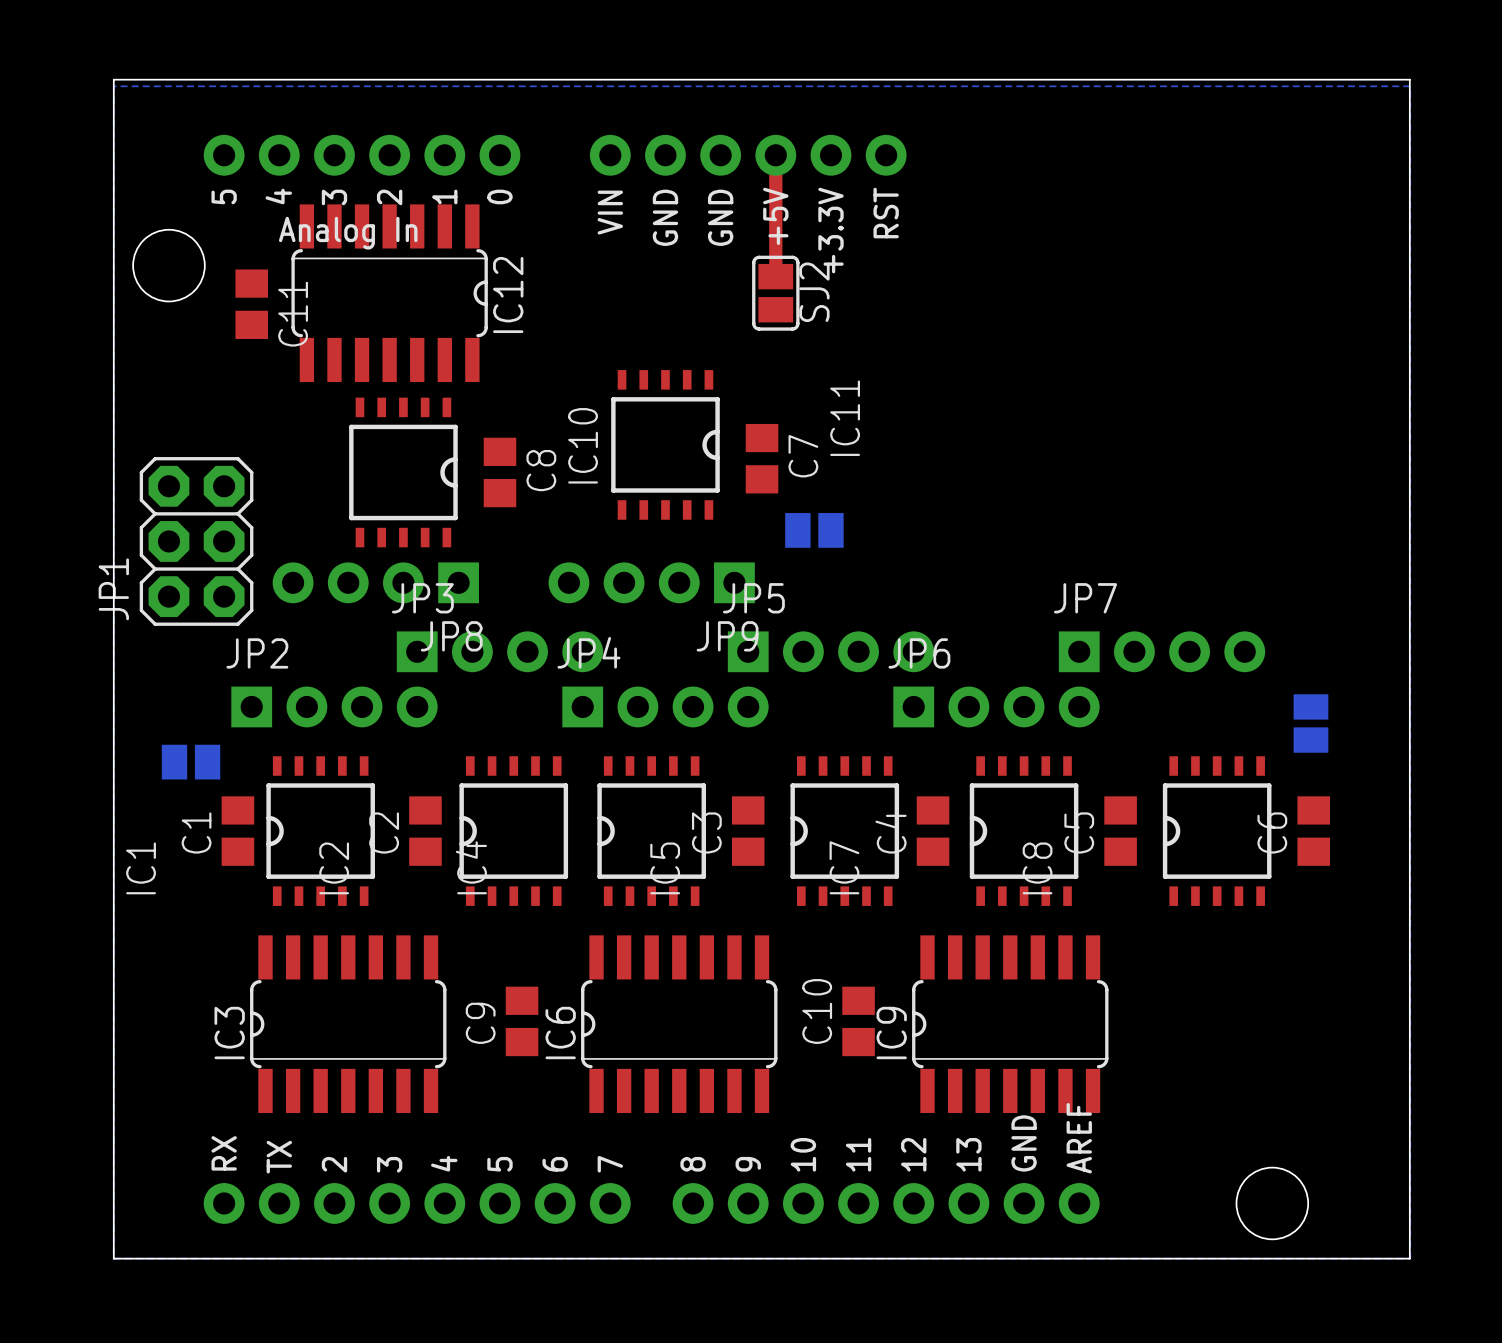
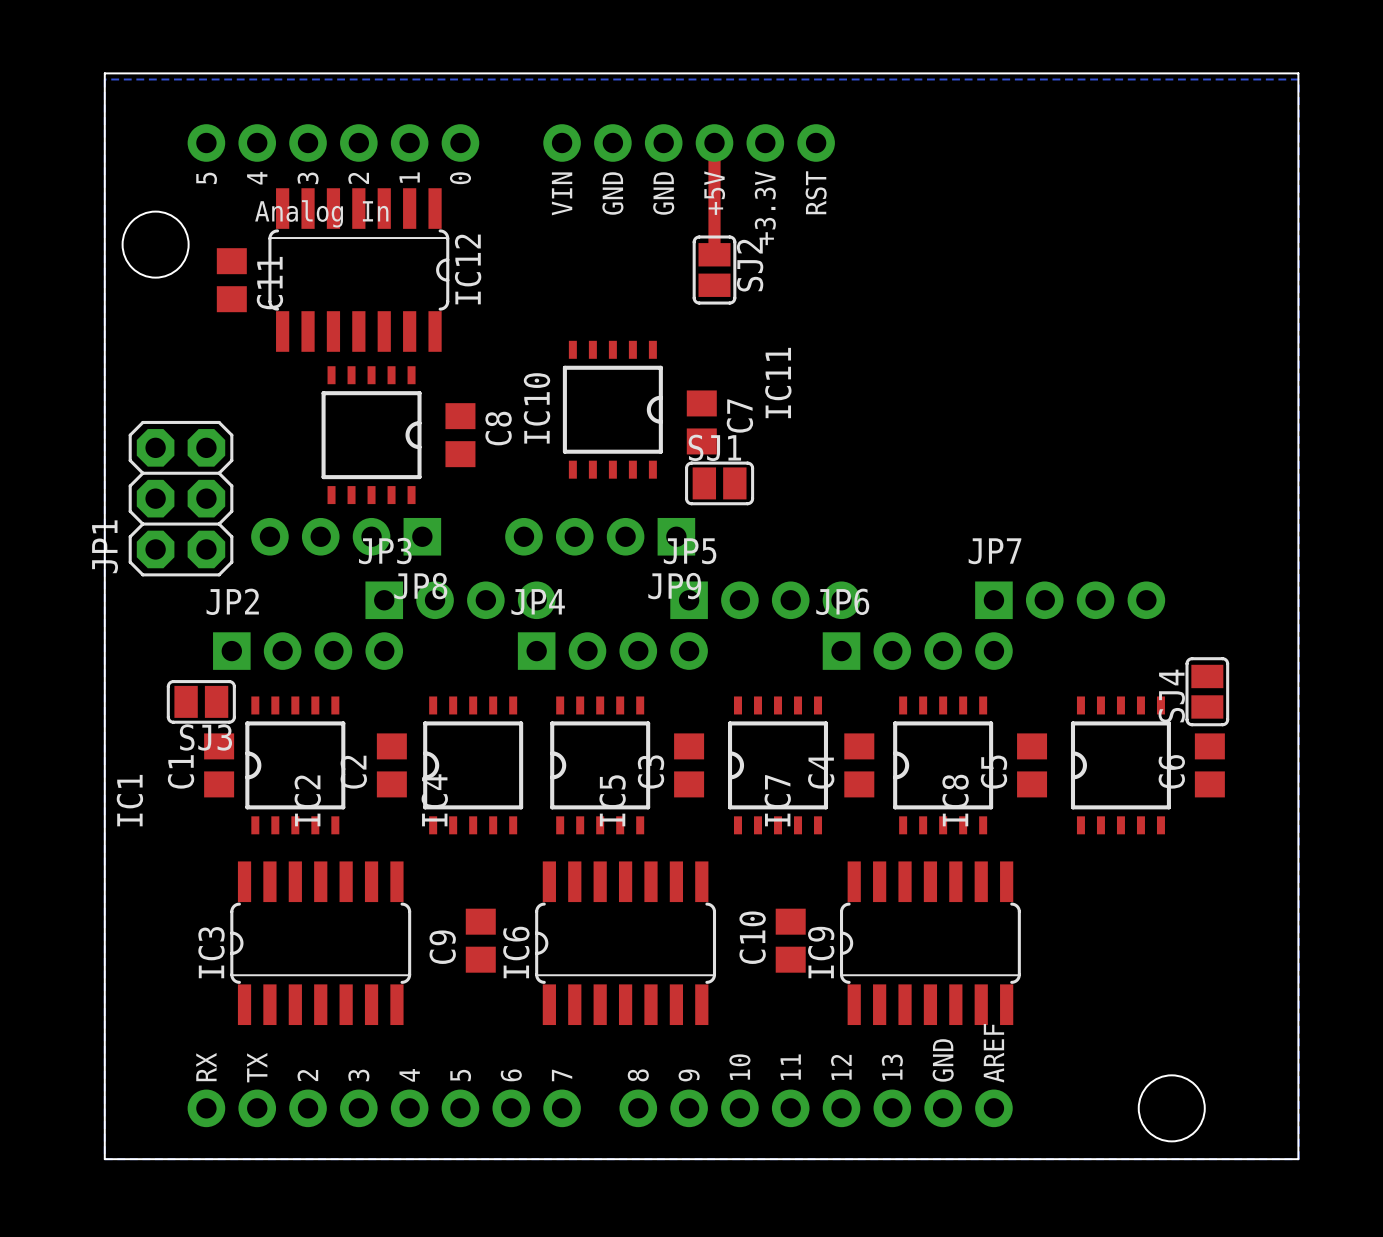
SJ1 side: bottom (814, 530) -> top (719, 483)
SJ4 side: bottom (1310, 723) -> top (1207, 691)
SJ3 side: bottom (191, 762) -> top (201, 701)

